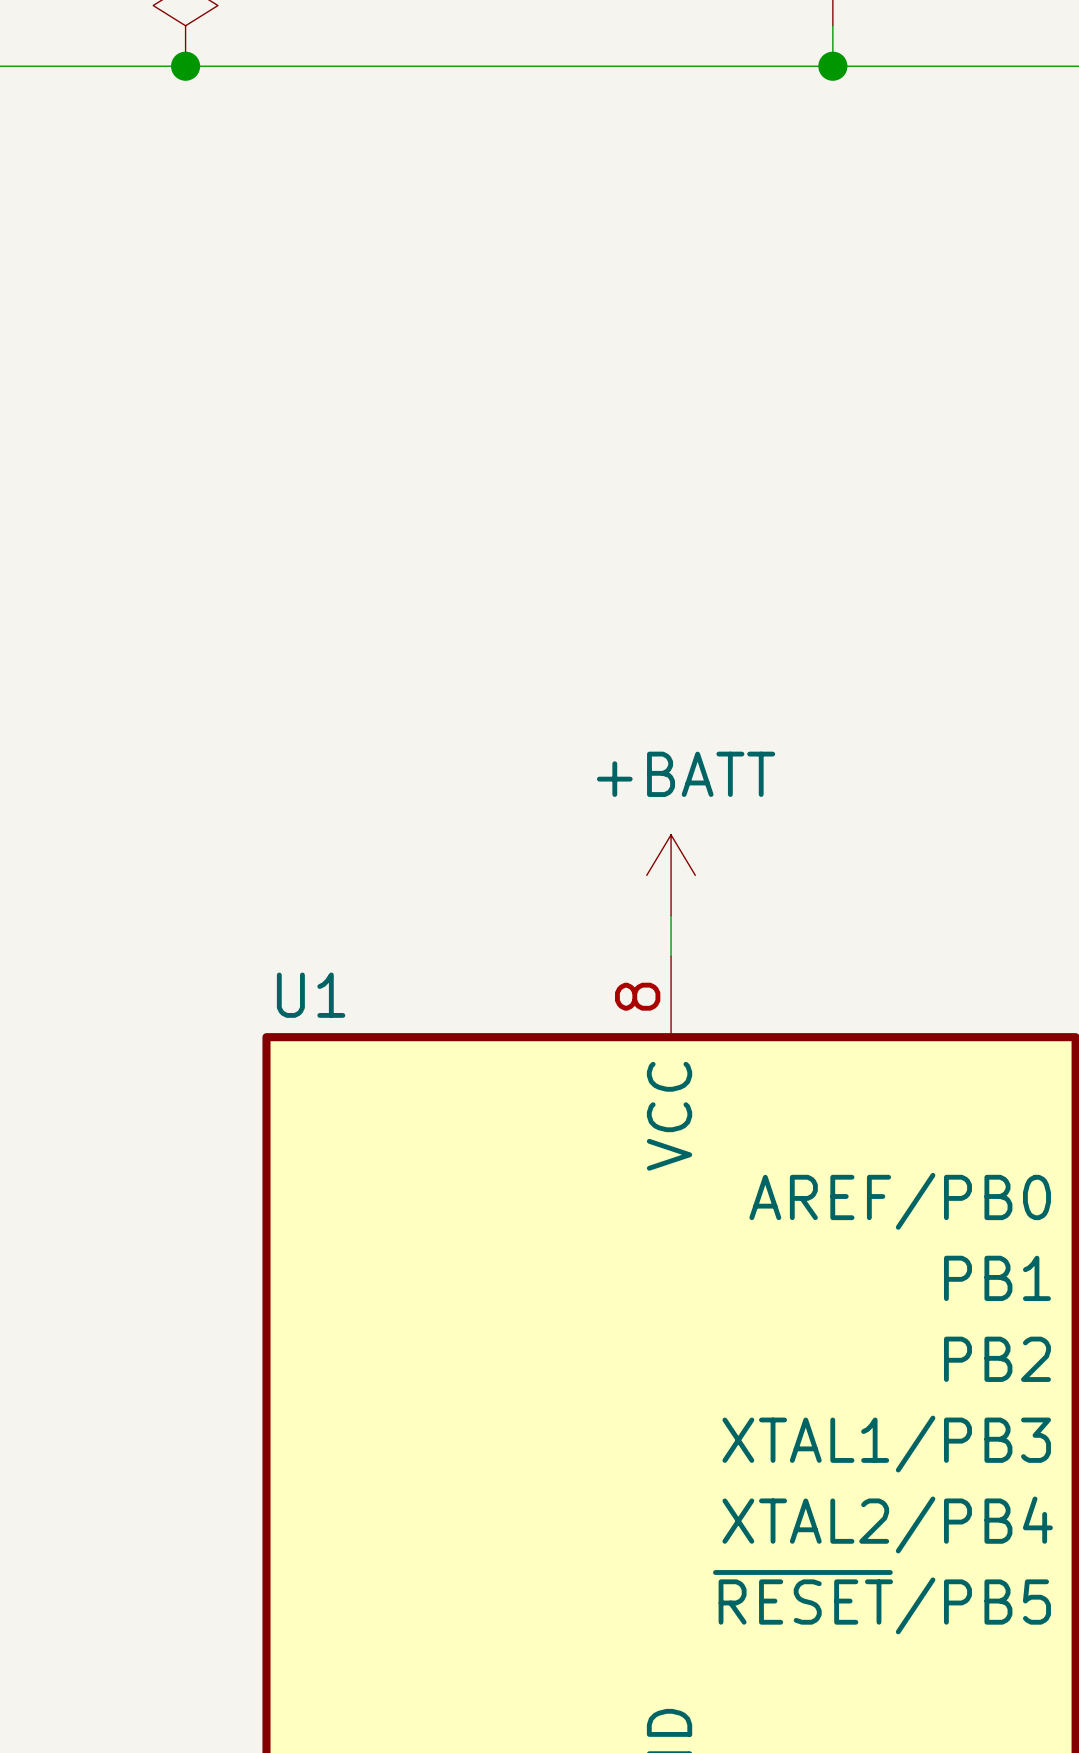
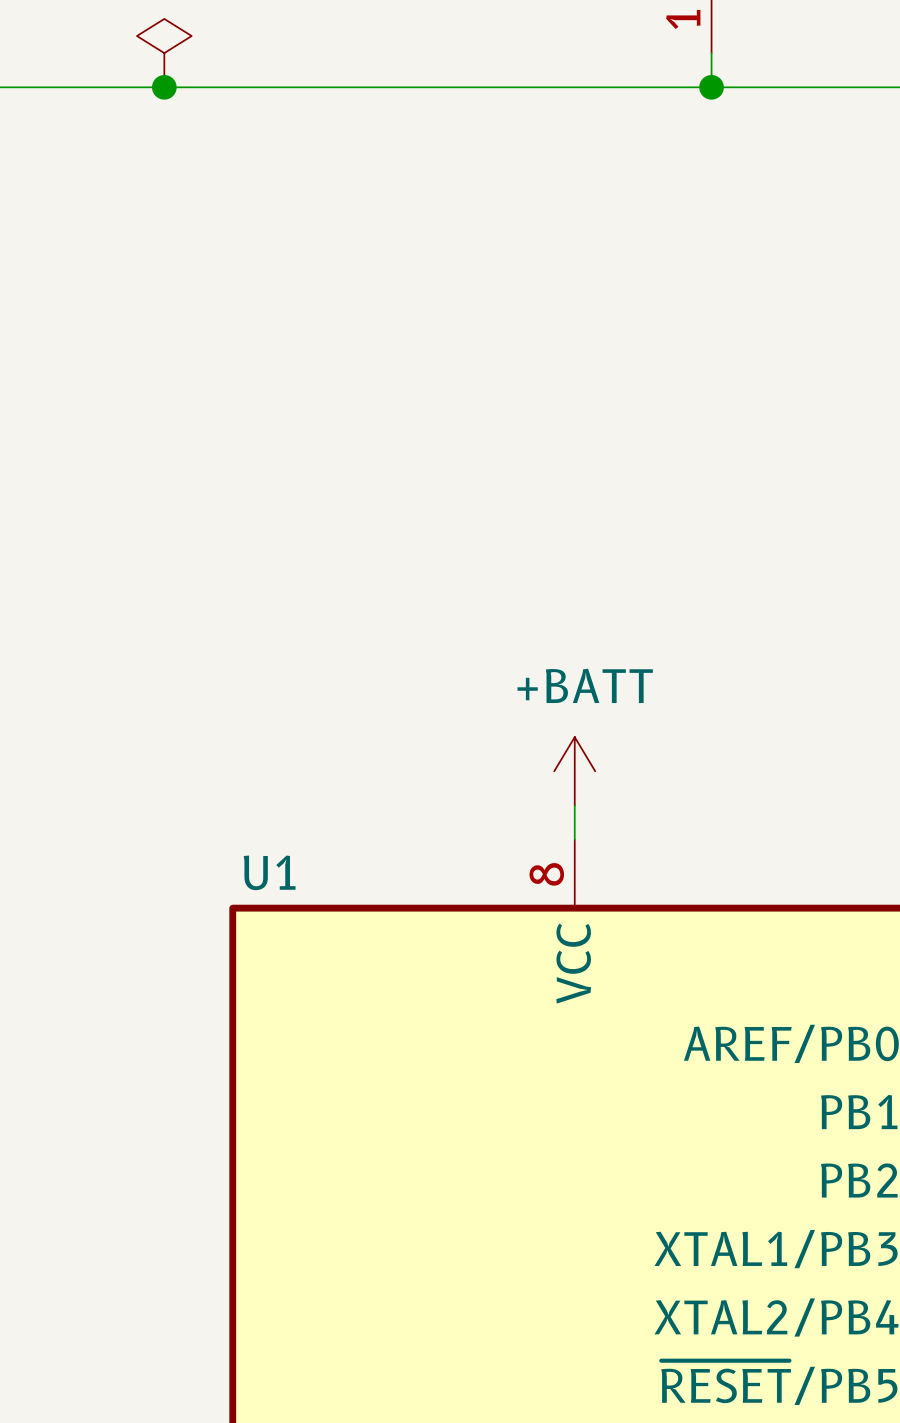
U1 name position: U1 (311, 995) -> U1 (269, 872)

